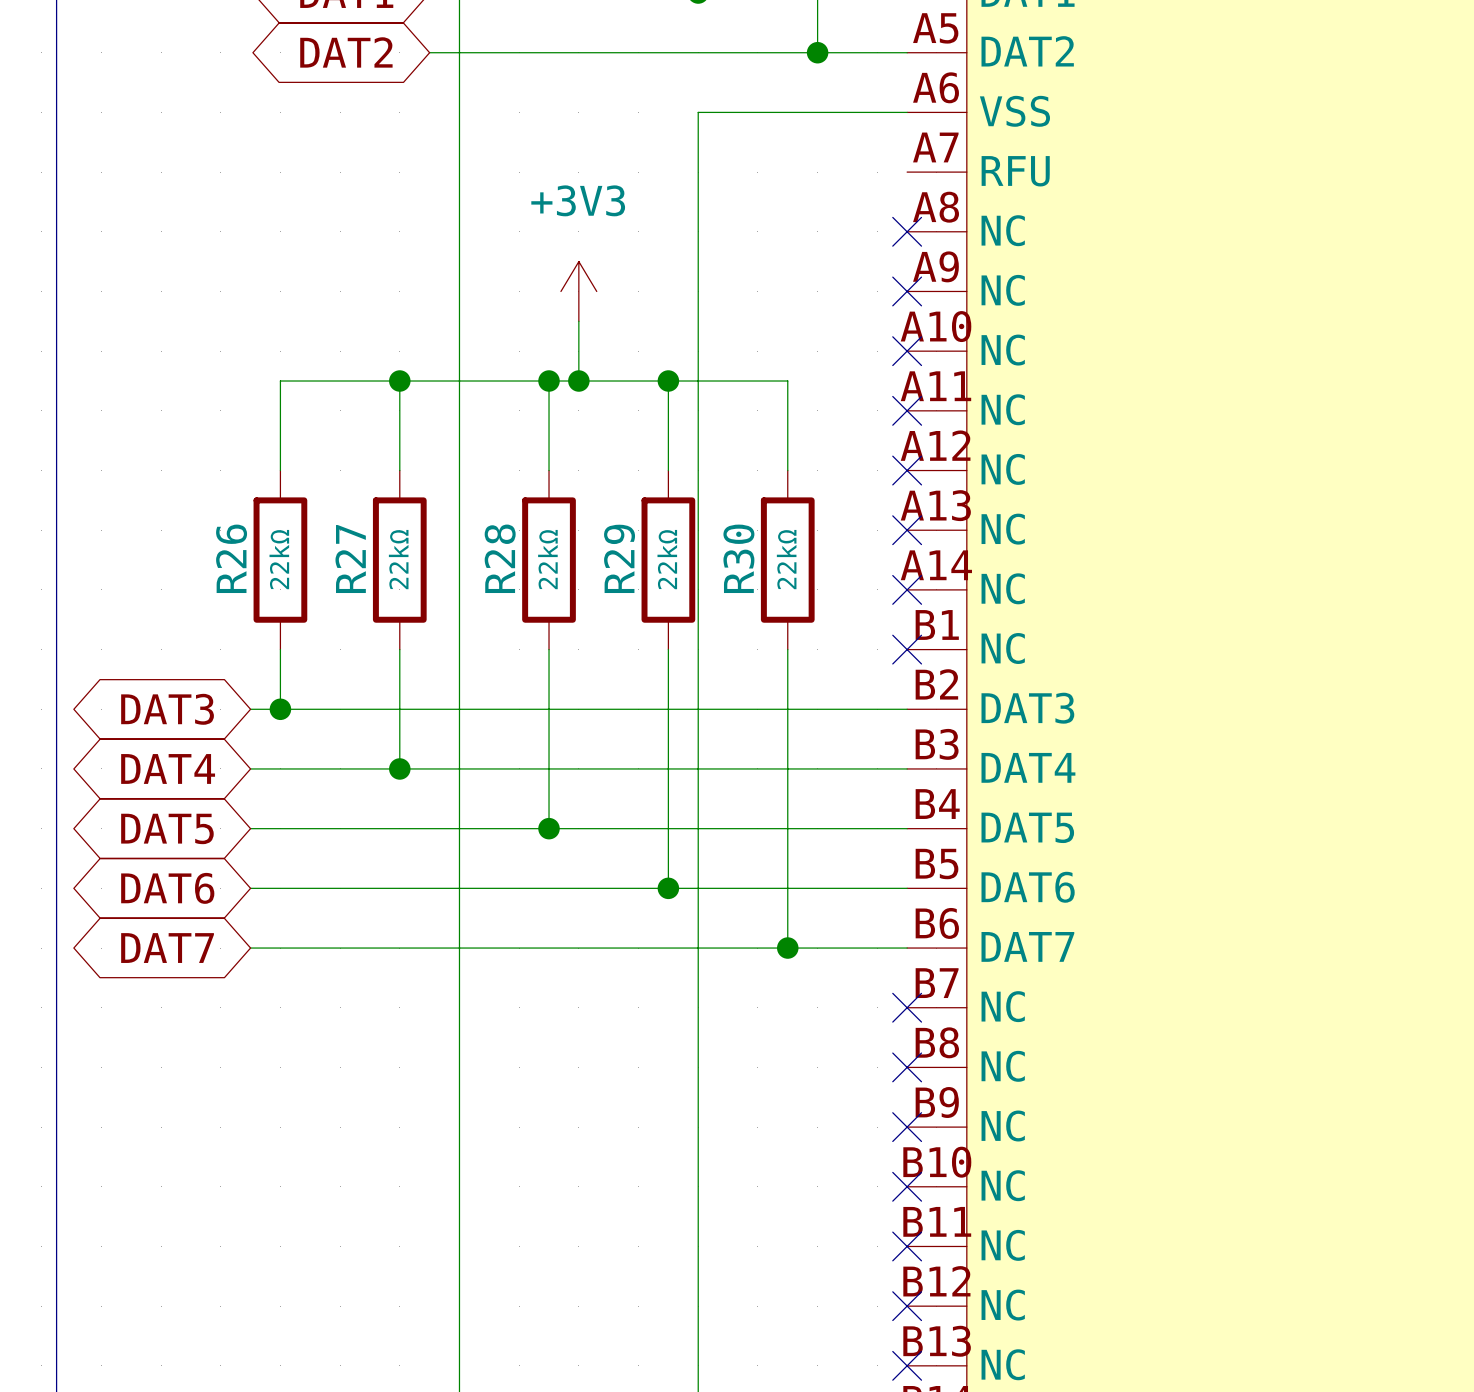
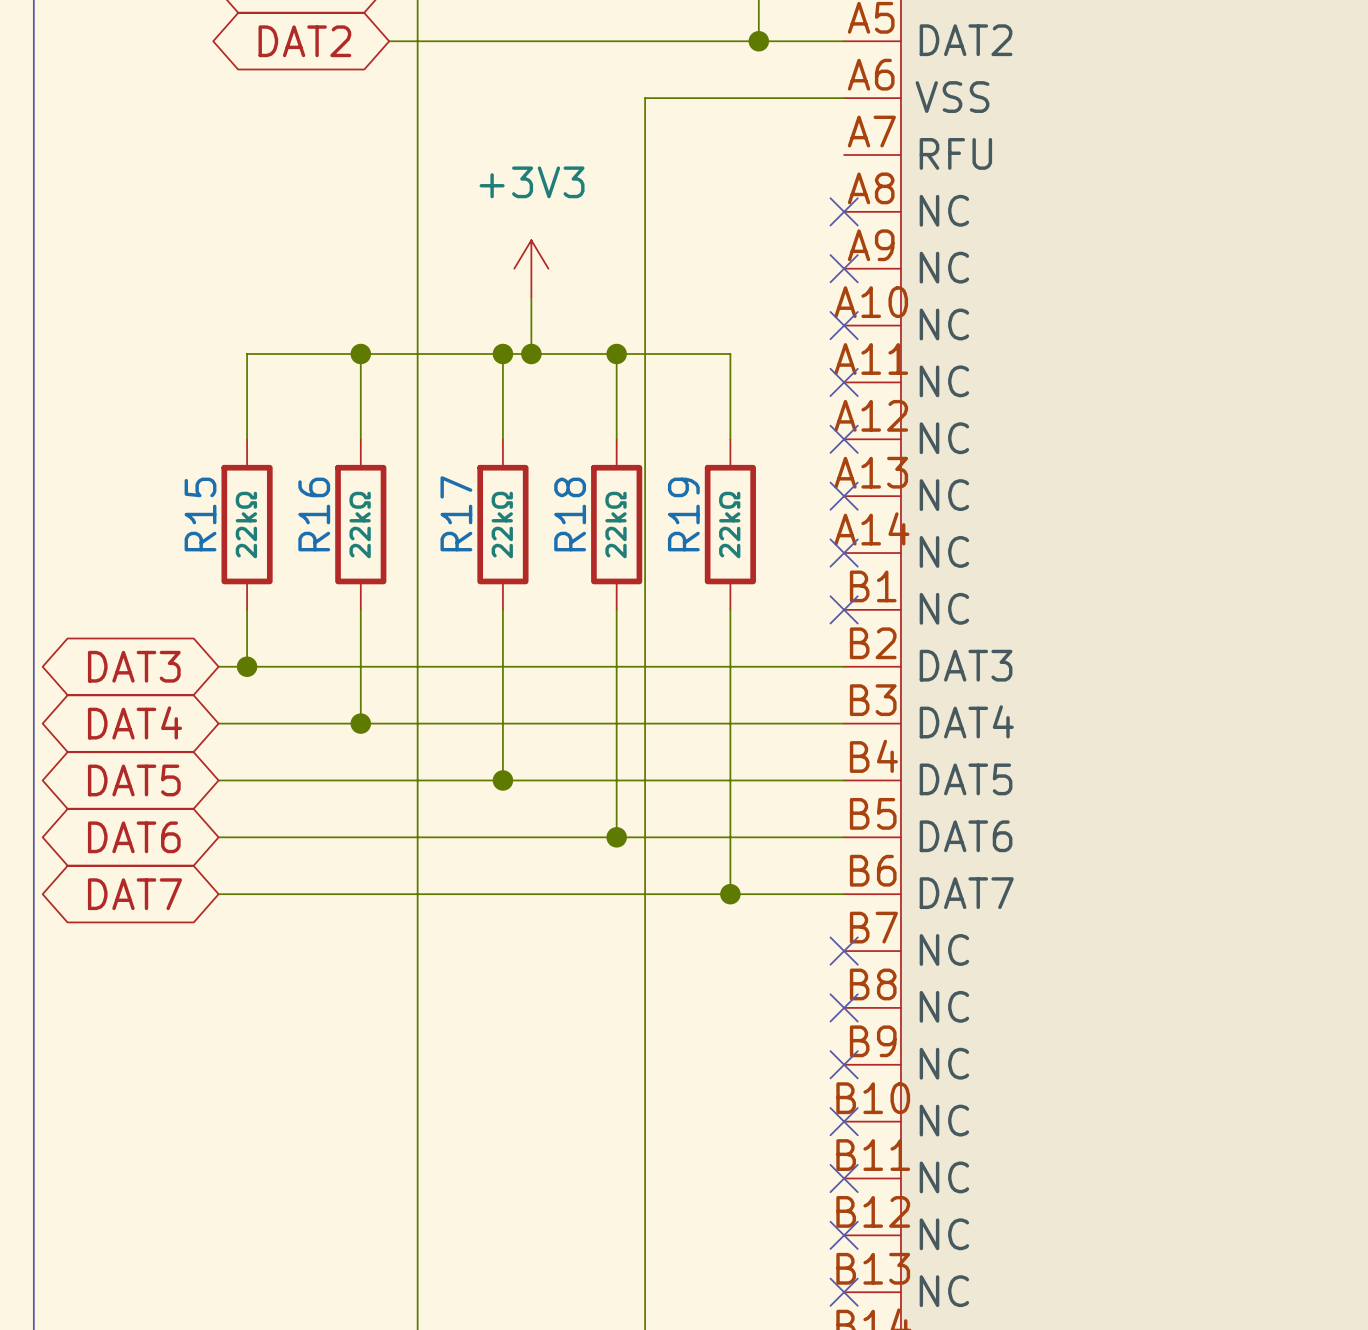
R26 name: R26 (231, 558) -> R15 (200, 514)
R28 name: R28 (500, 558) -> R17 (456, 513)
R29 name: R29 (619, 558) -> R18 (570, 514)
R30 name: R30 (738, 558) -> R19 (683, 514)
R27 name: R27 (350, 559) -> R16 (314, 514)

